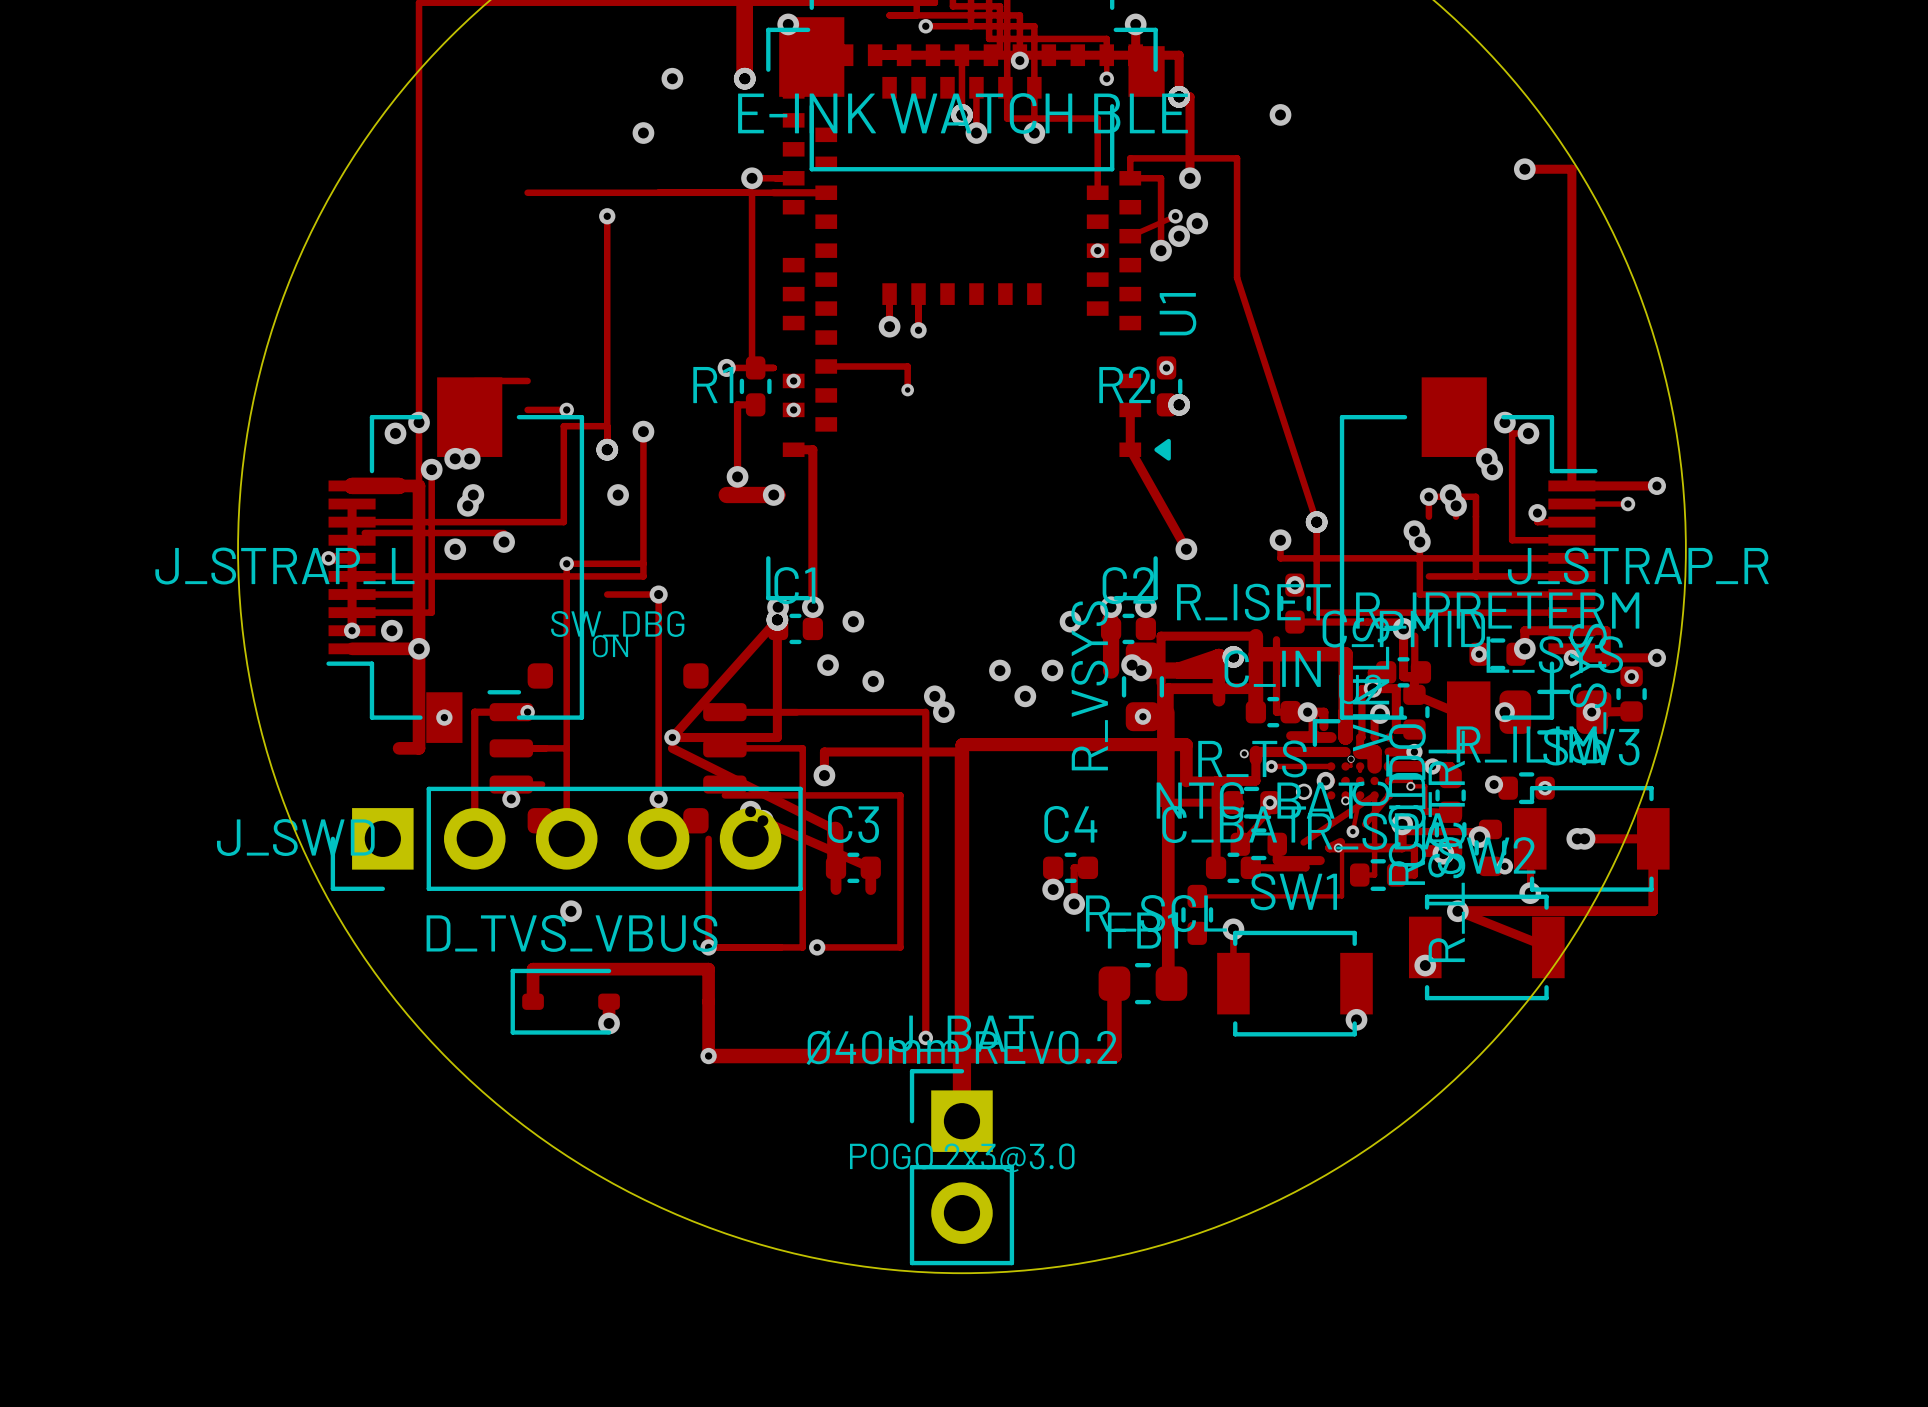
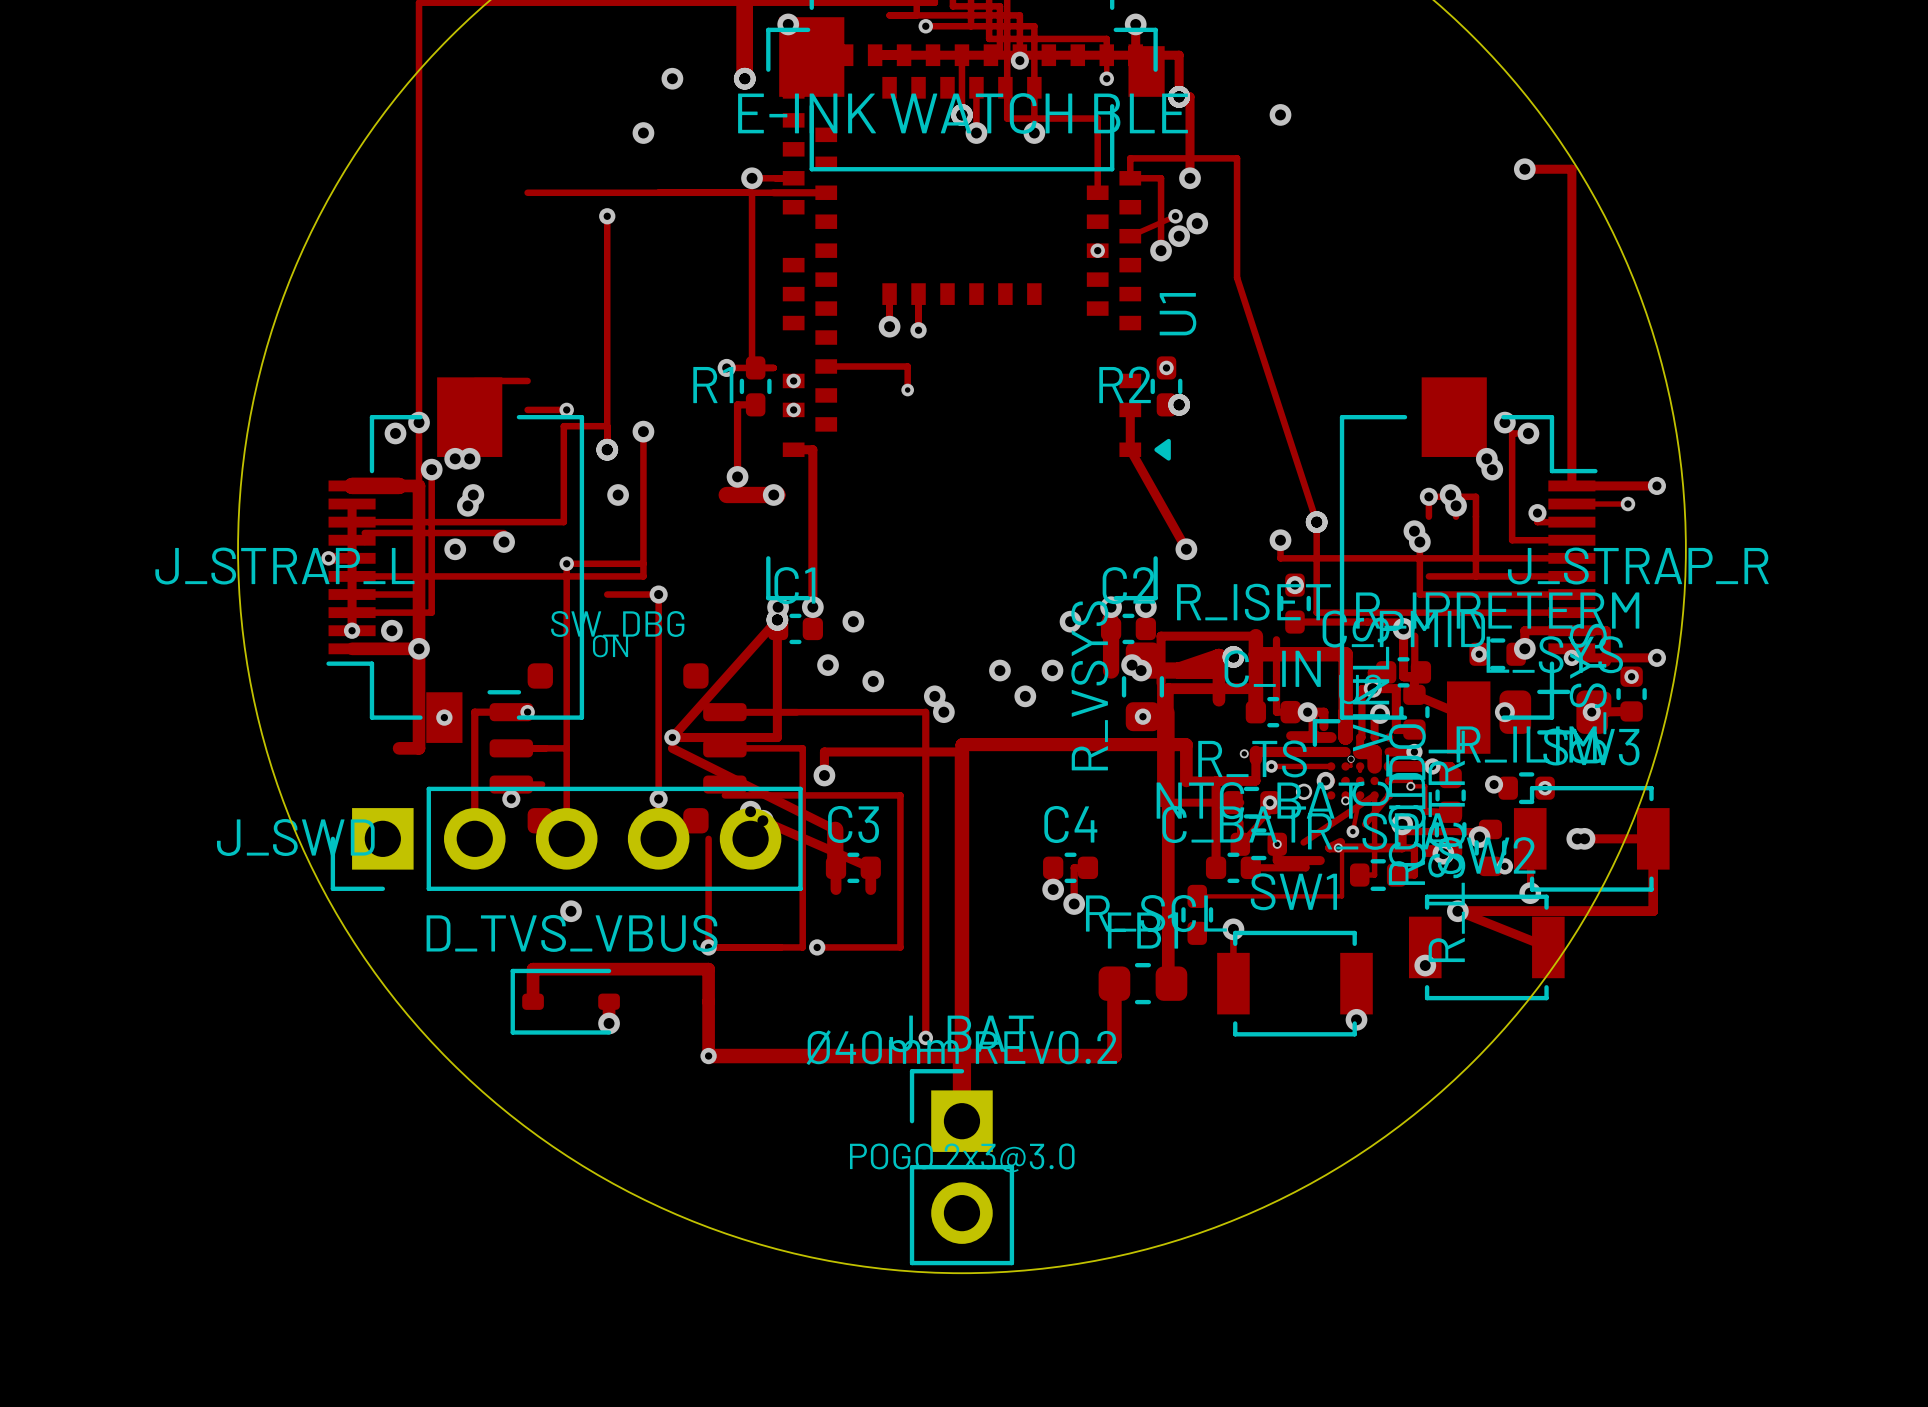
via: none -> (1277, 844)

